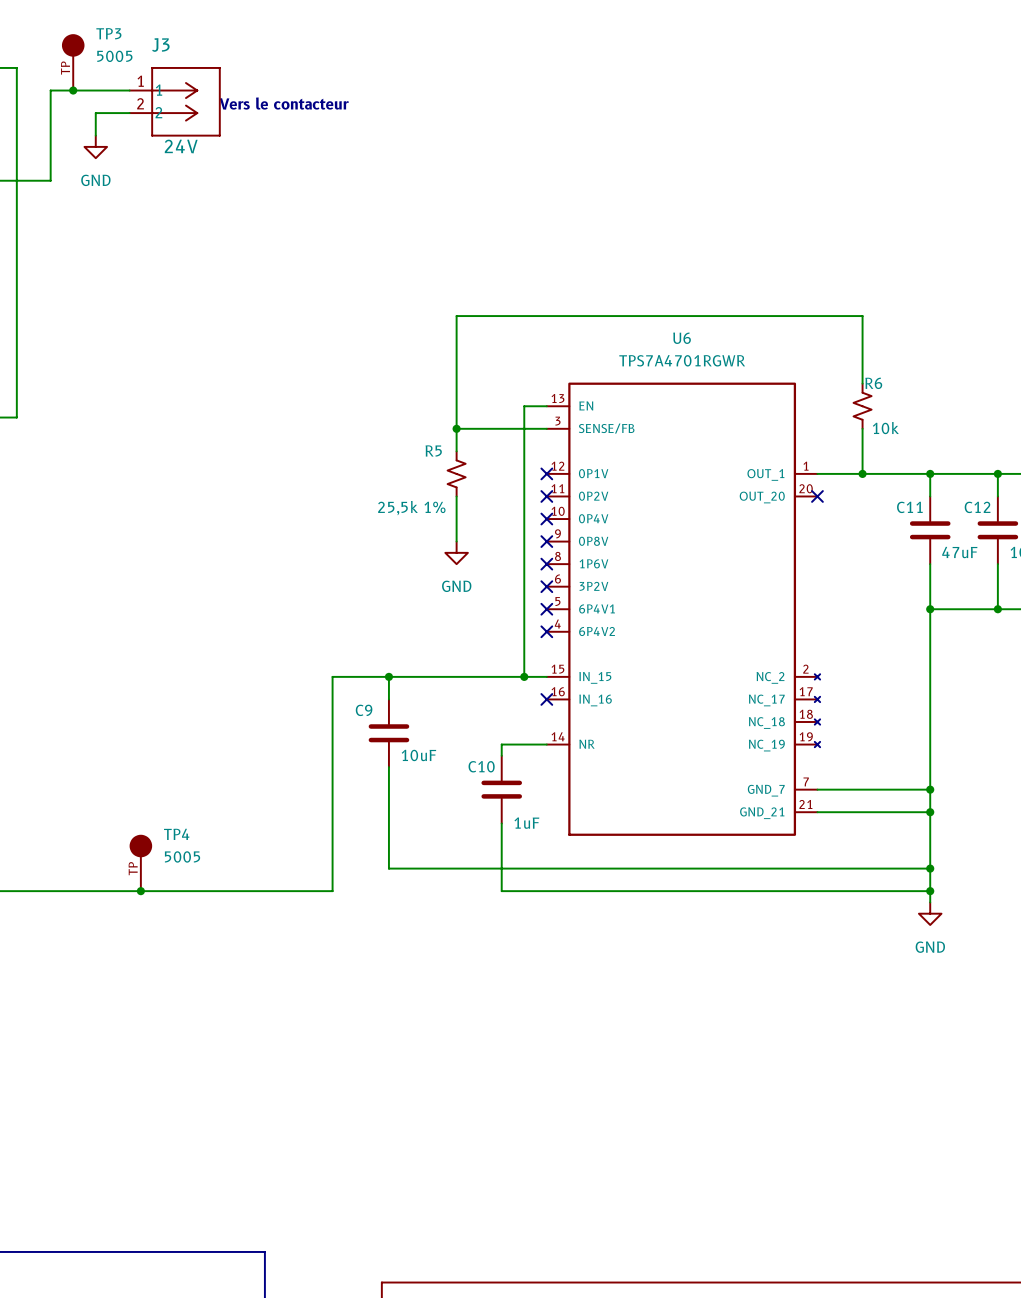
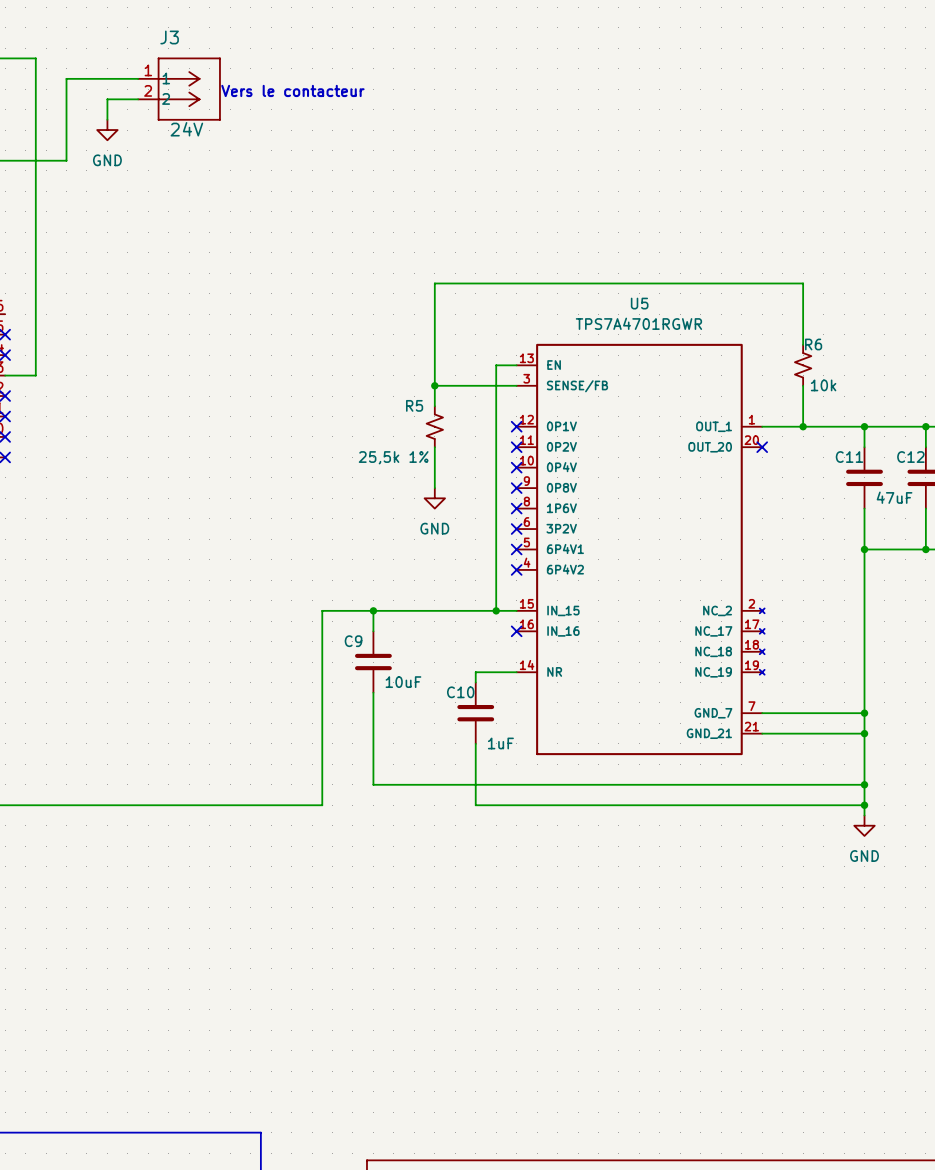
TP3: 5005 (73, 62) -> none
junction: (73, 90) -> none
U6 name: U6 (682, 338) -> U5 (639, 303)
TP4: 5005 (140, 862) -> none
junction: (140, 891) -> none

